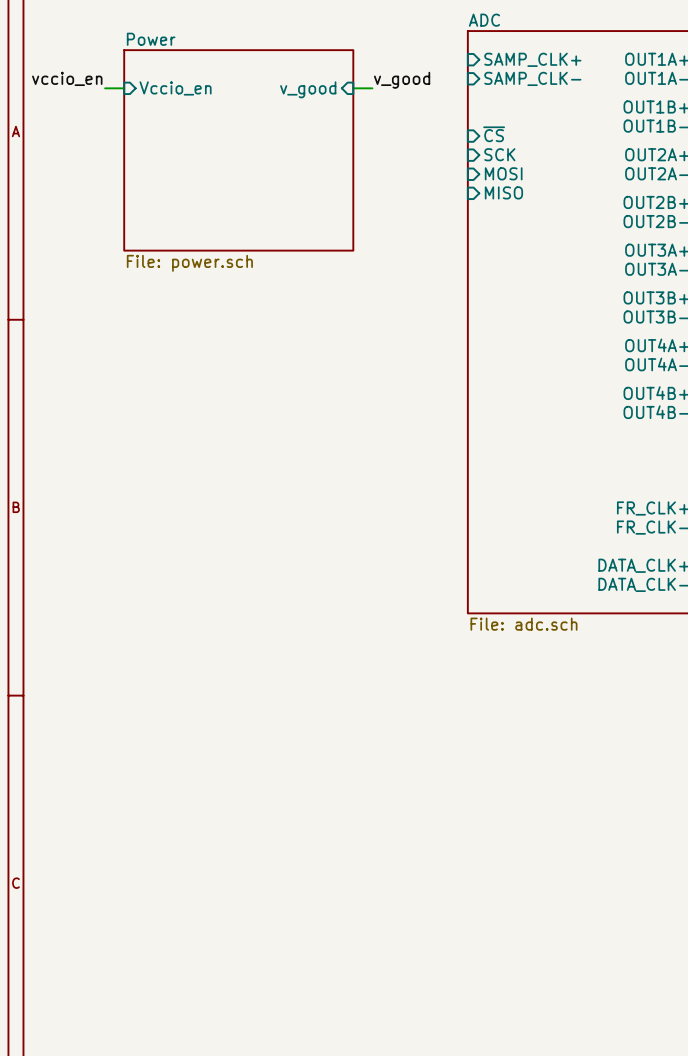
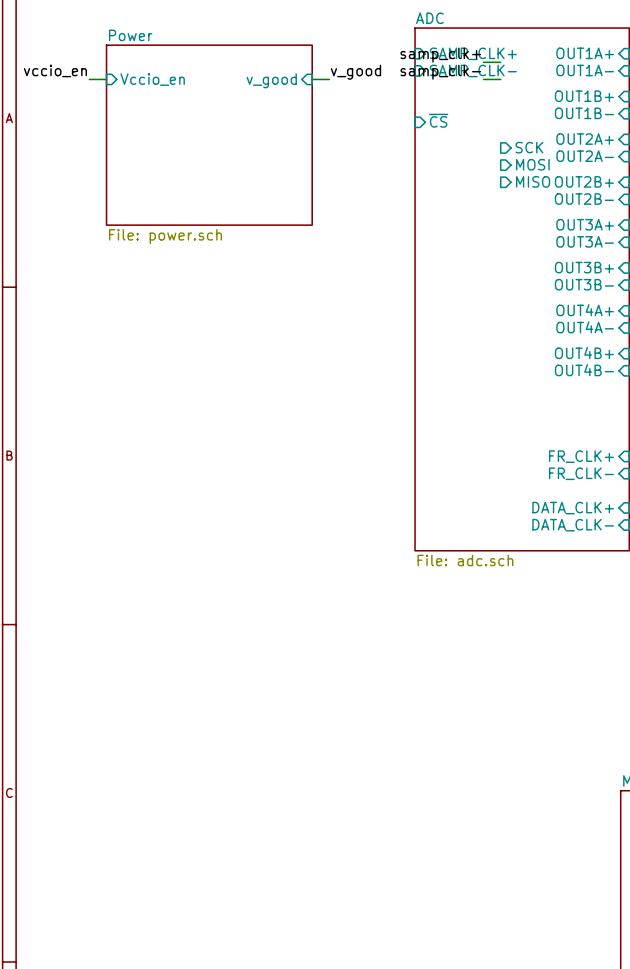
label: none -> samp_clk+ (440, 55)
wire: none -> (483, 62) (500, 62)
label: none -> samp_clk- (440, 72)
wire: none -> (483, 79) (500, 79)
sheet pin position: SCK (499, 154) -> SCK (529, 147)
sheet pin position: MOSI (503, 173) -> MOSI (532, 164)
sheet pin position: MISO (503, 192) -> MISO (533, 181)

